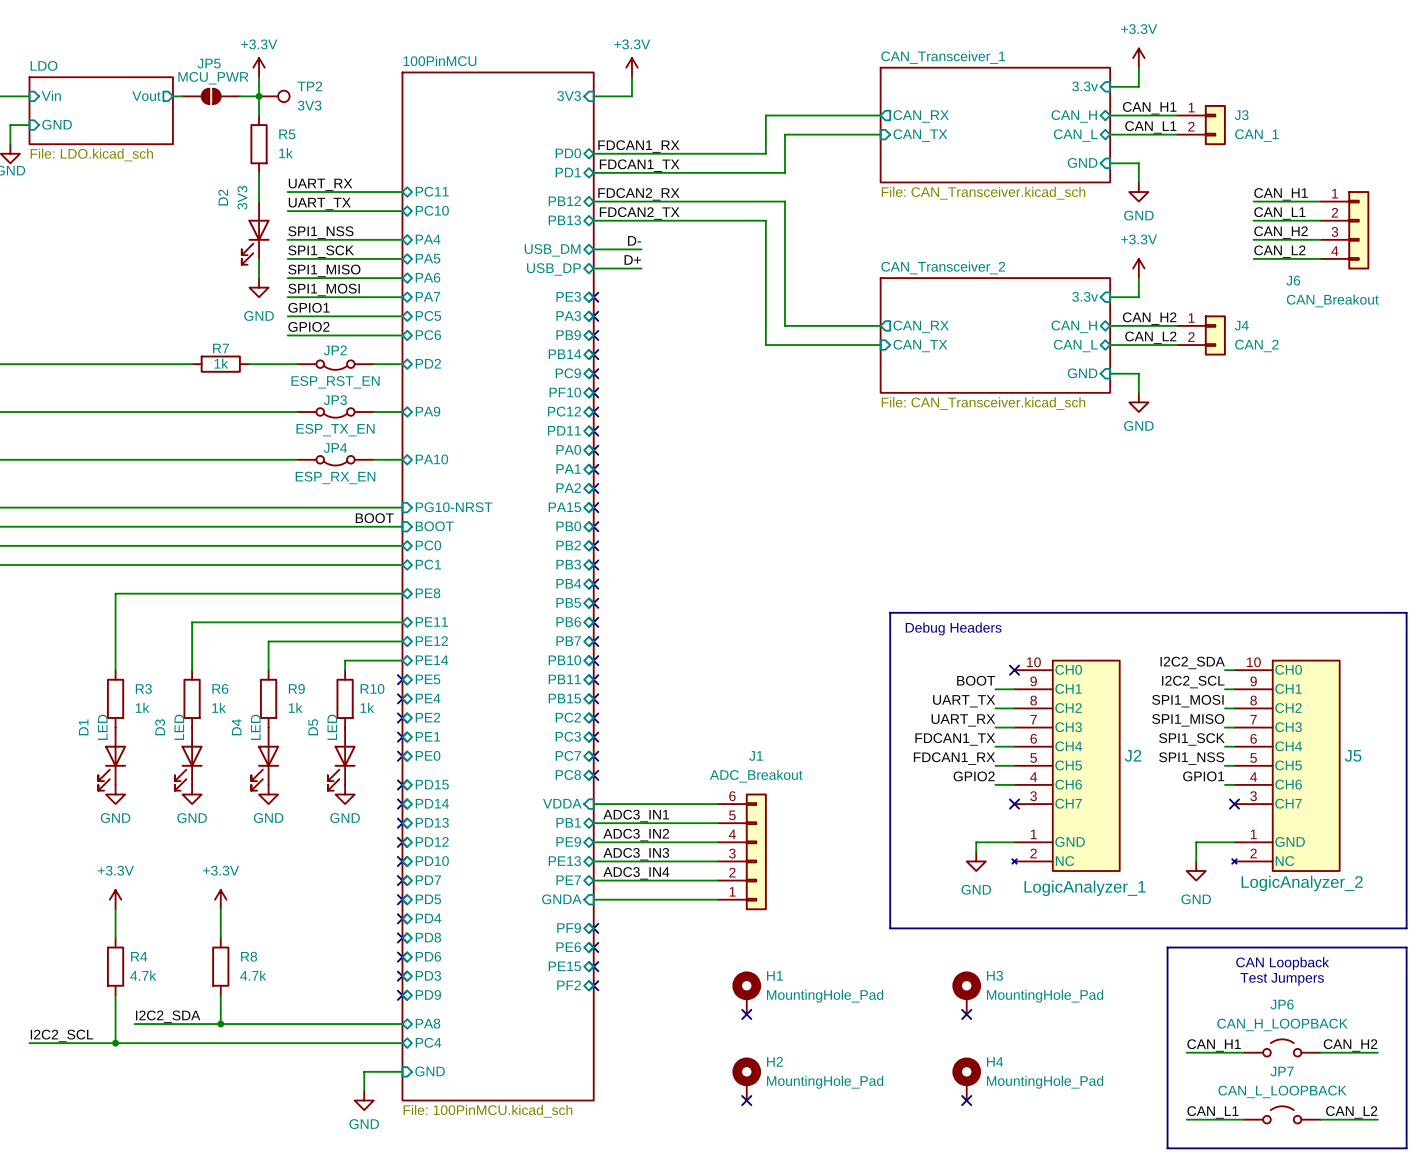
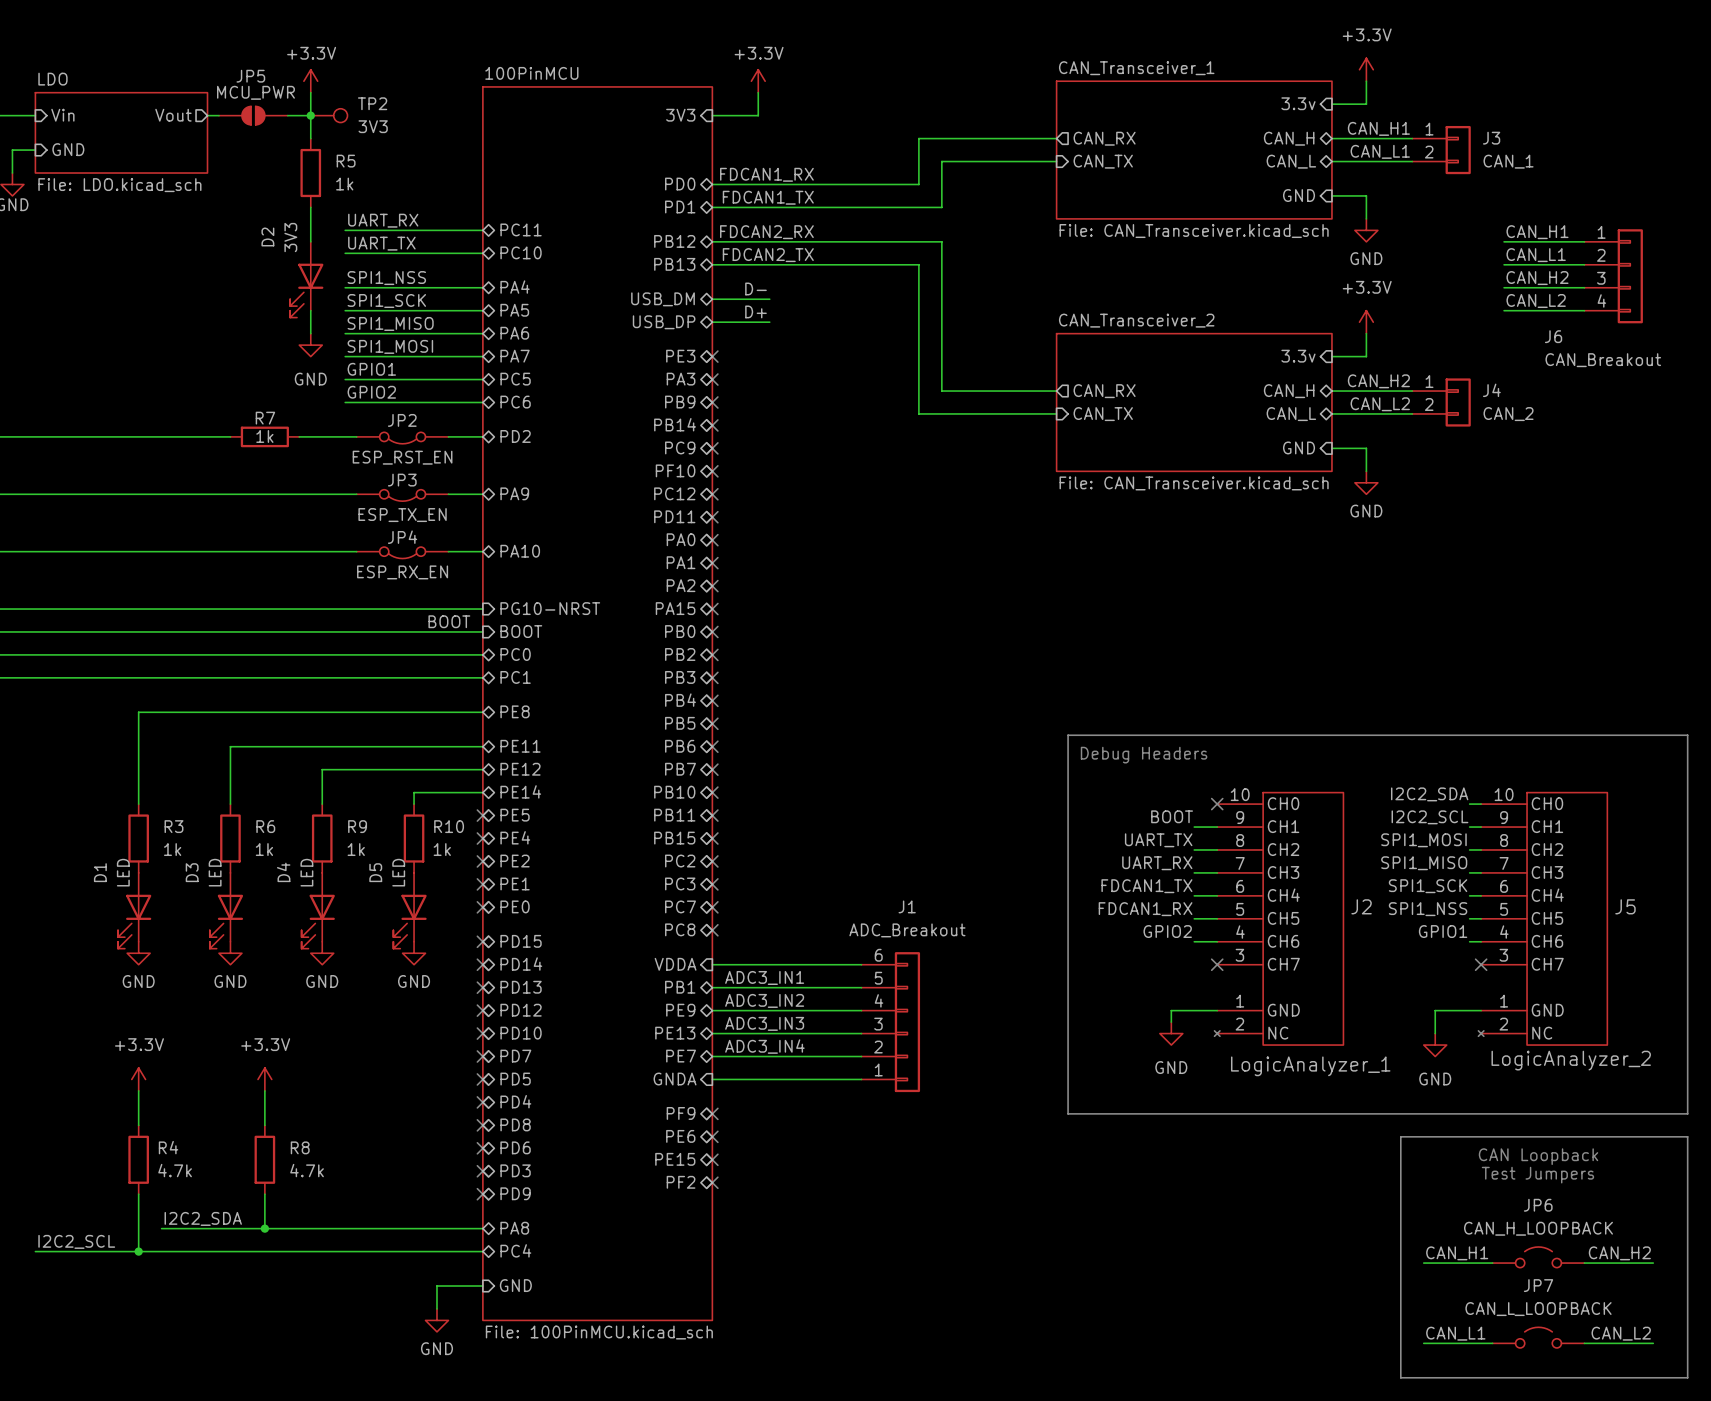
H1: MountingHole_Pad (746, 992) -> none
H3: MountingHole_Pad (966, 992) -> none
no-connect mark: (746, 1014) -> none
no-connect mark: (966, 1014) -> none
H2: MountingHole_Pad (746, 1079) -> none
H4: MountingHole_Pad (966, 1079) -> none
no-connect mark: (746, 1100) -> none
no-connect mark: (966, 1100) -> none

